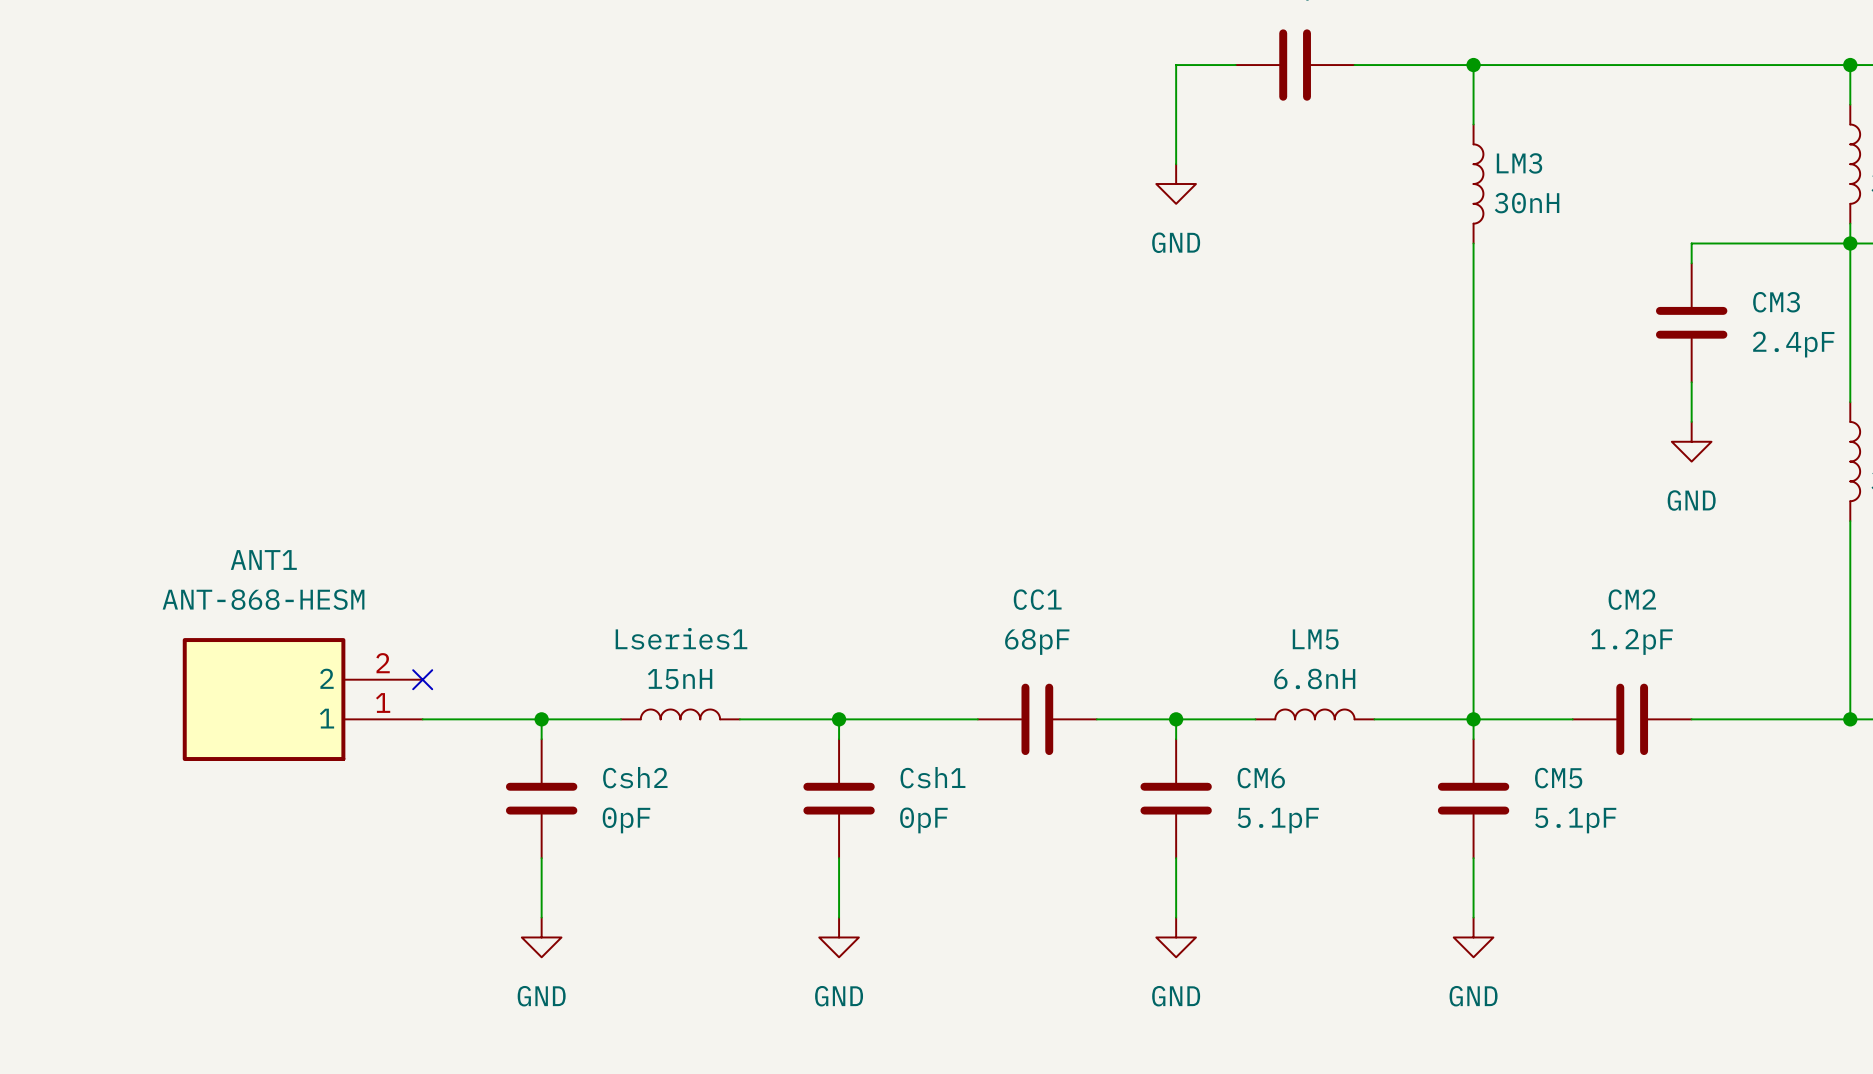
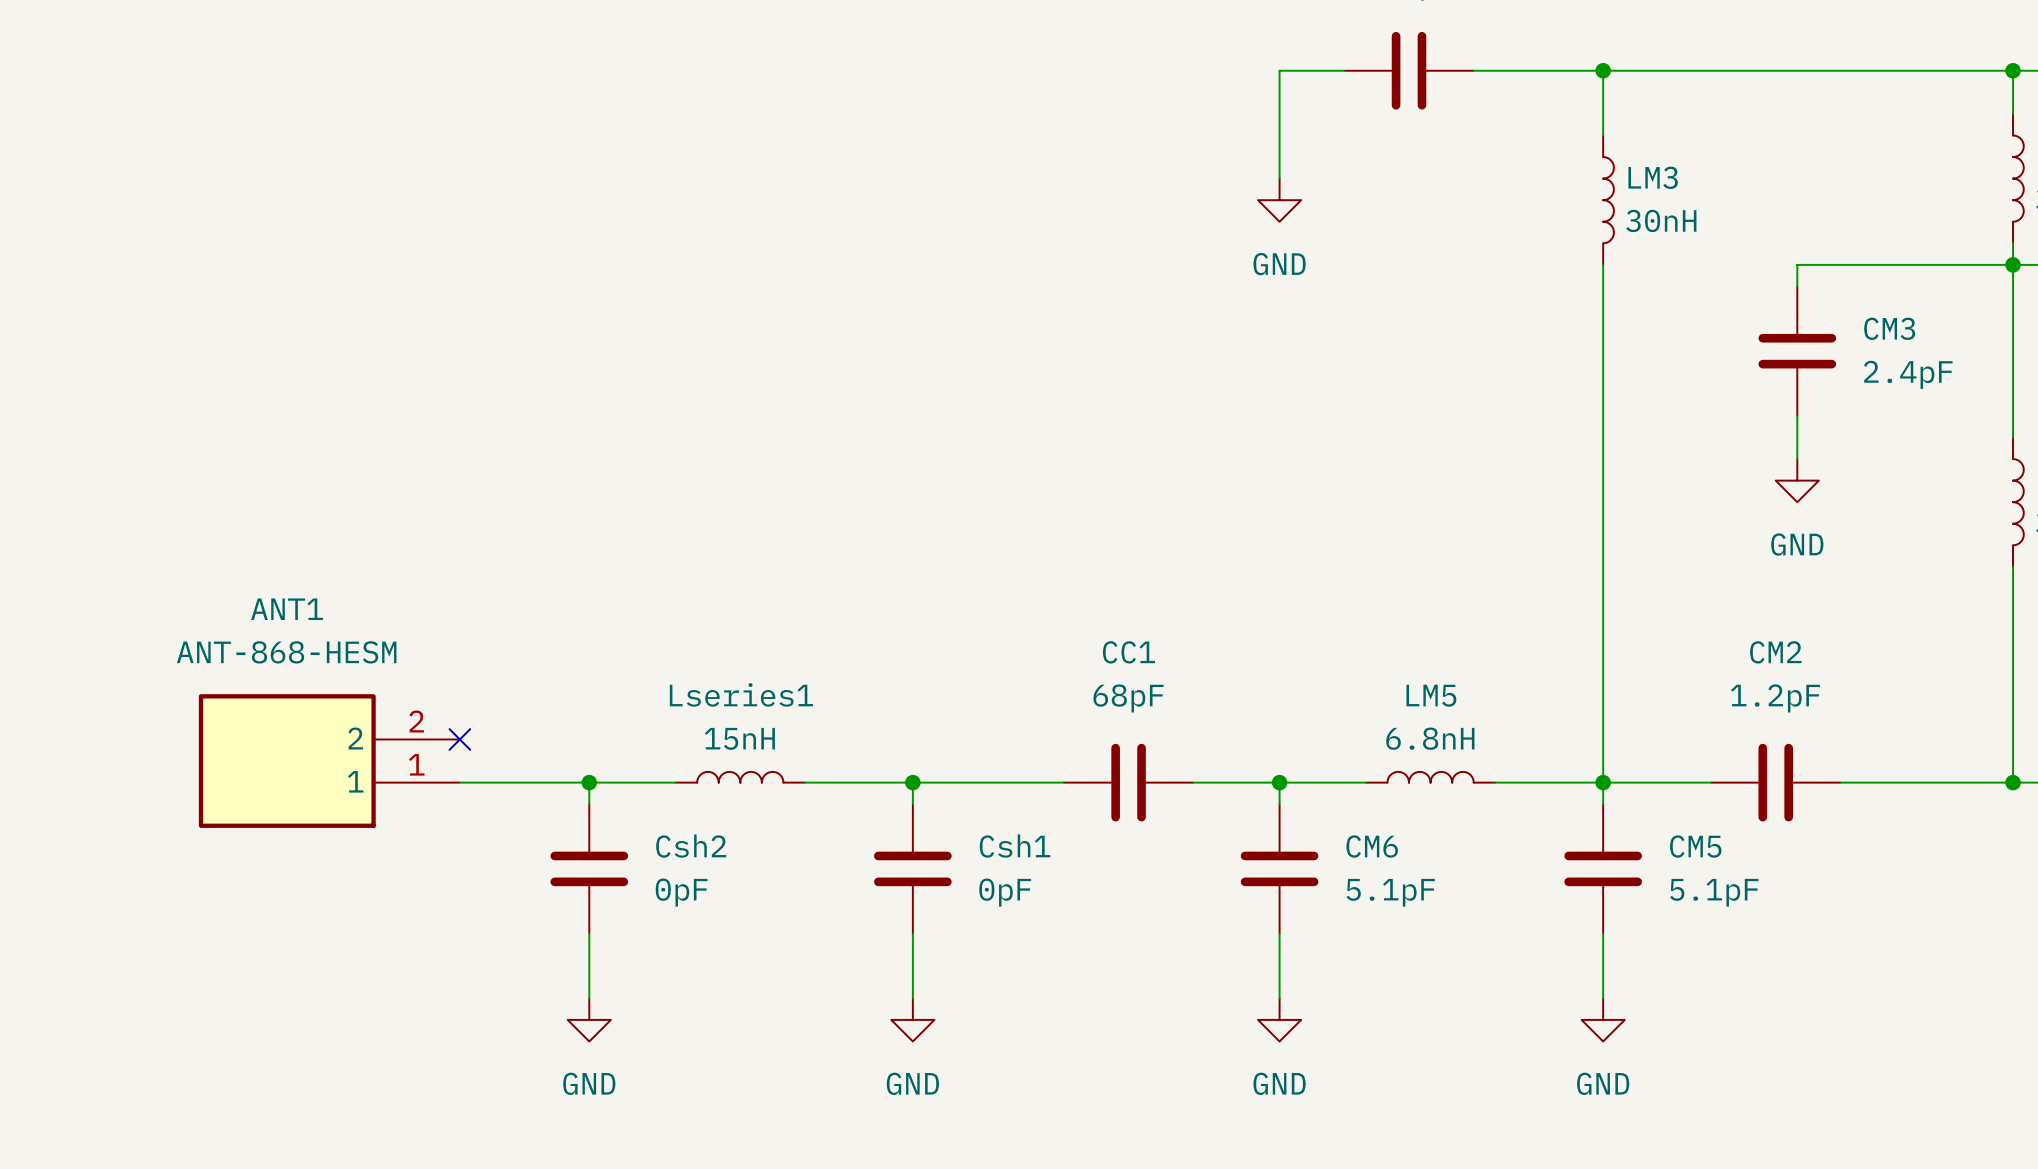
wire: (1691, 243) (1691, 263) -> (1840, 264) (1797, 264) (1797, 286)
CM3 position: (1691, 322) -> (1797, 351)
wire: (1691, 382) (1691, 421) -> (1797, 415) (1797, 459)
power symbol position: GND (1691, 441) -> GND (1797, 480)

